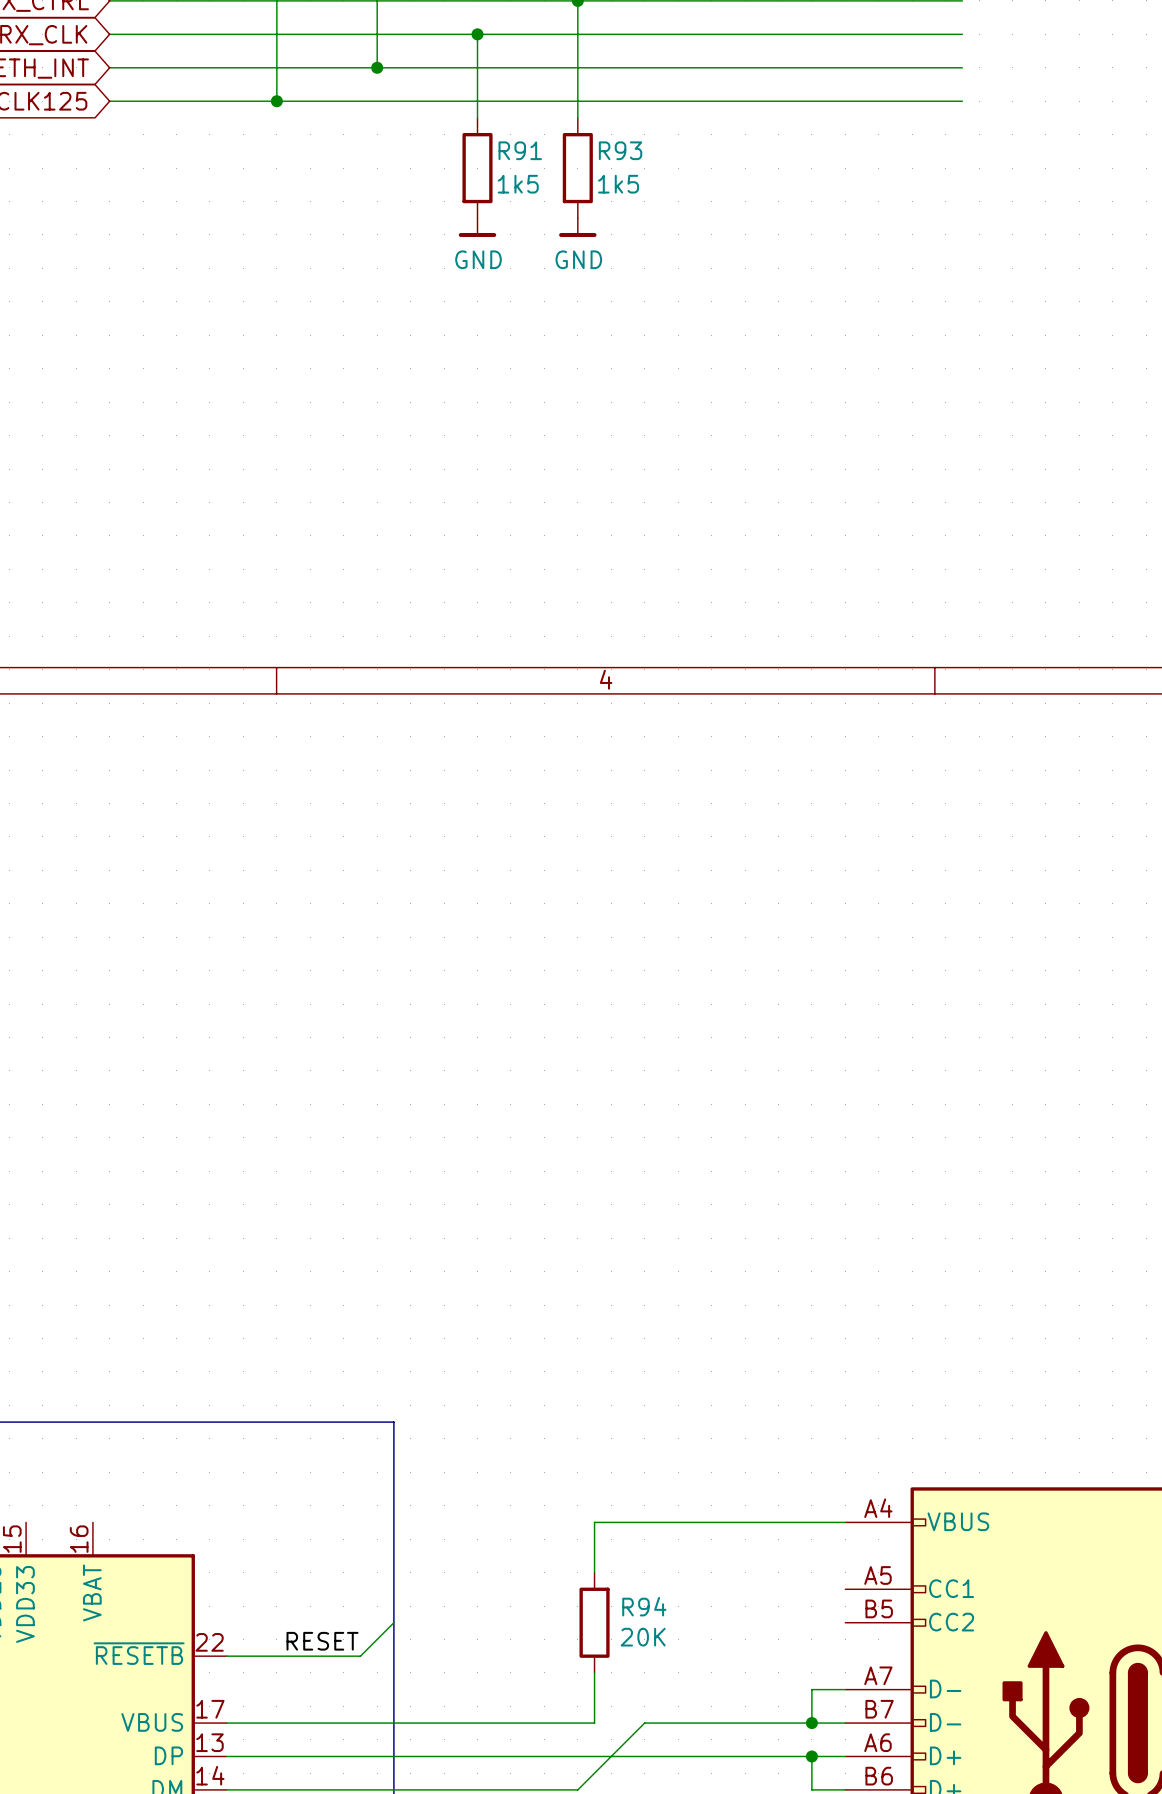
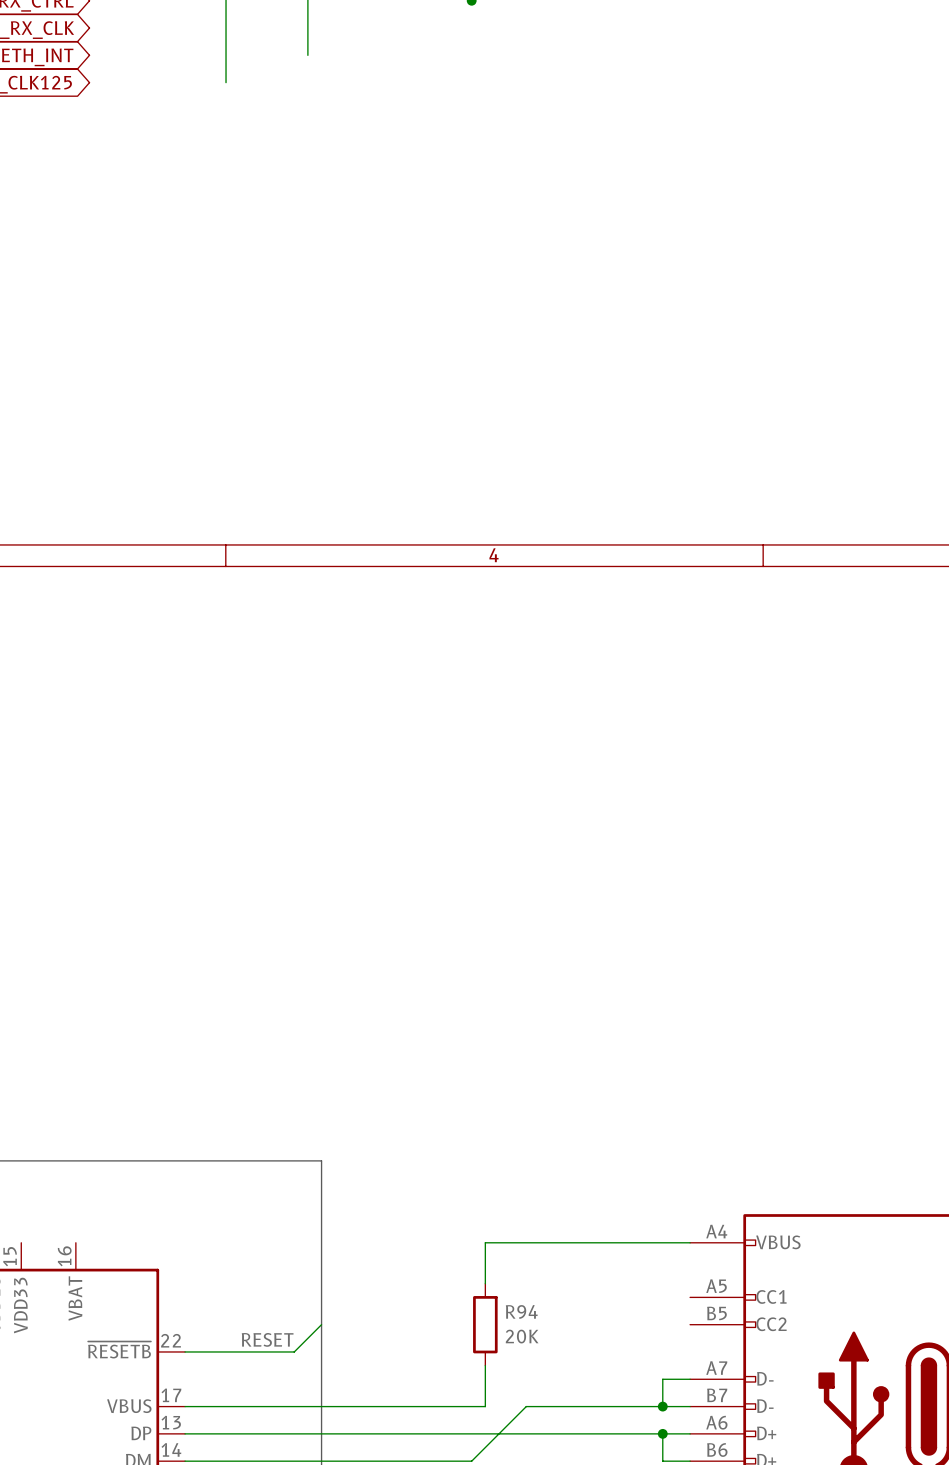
wire: (109, 0) (962, 0) -> none
wire: (577, 0) (577, 117) -> none
wire: (109, 34) (962, 34) -> none
wire: (477, 34) (477, 117) -> none
junction: (477, 34) -> none
wire: (109, 67) (962, 67) -> none
junction: (377, 67) -> none
wire: (109, 101) (962, 101) -> none
junction: (276, 101) -> none
R91: 1k5 (477, 168) -> none
R93: 1k5 (577, 168) -> none
power symbol: GND (477, 227) -> none
power symbol: GND (577, 227) -> none

